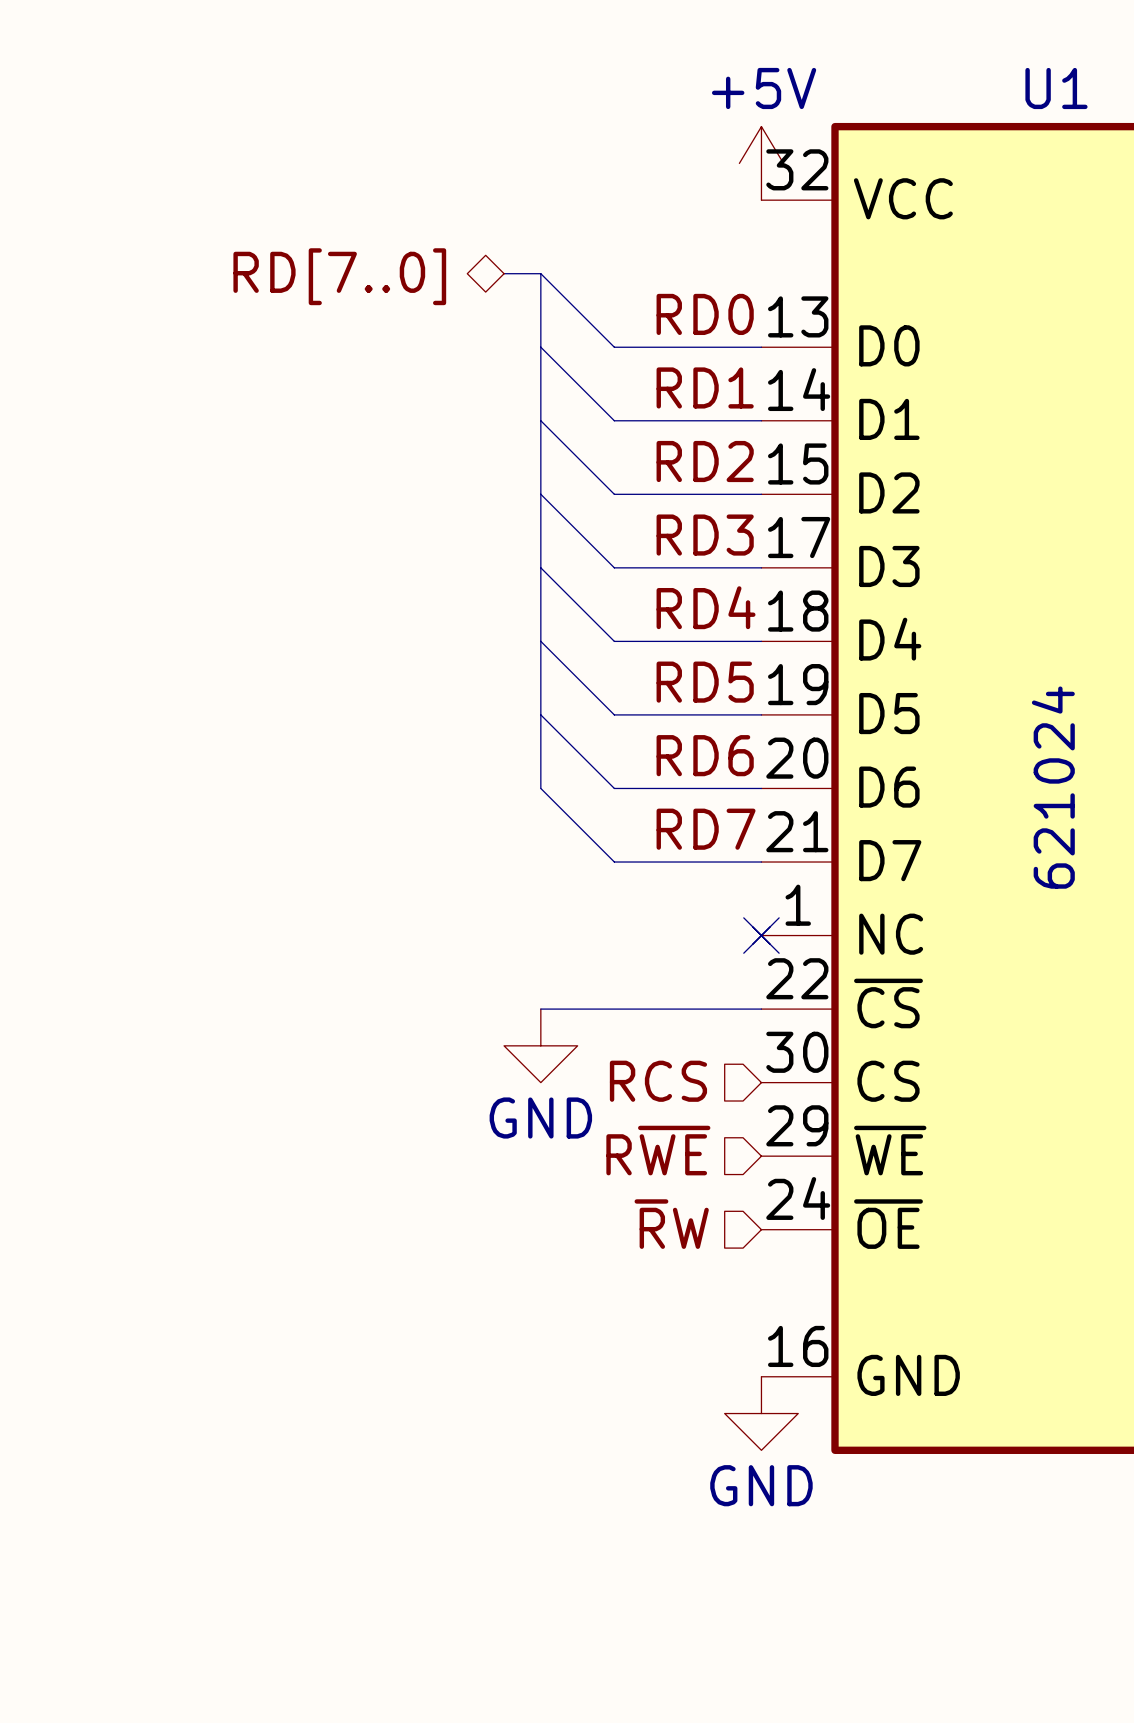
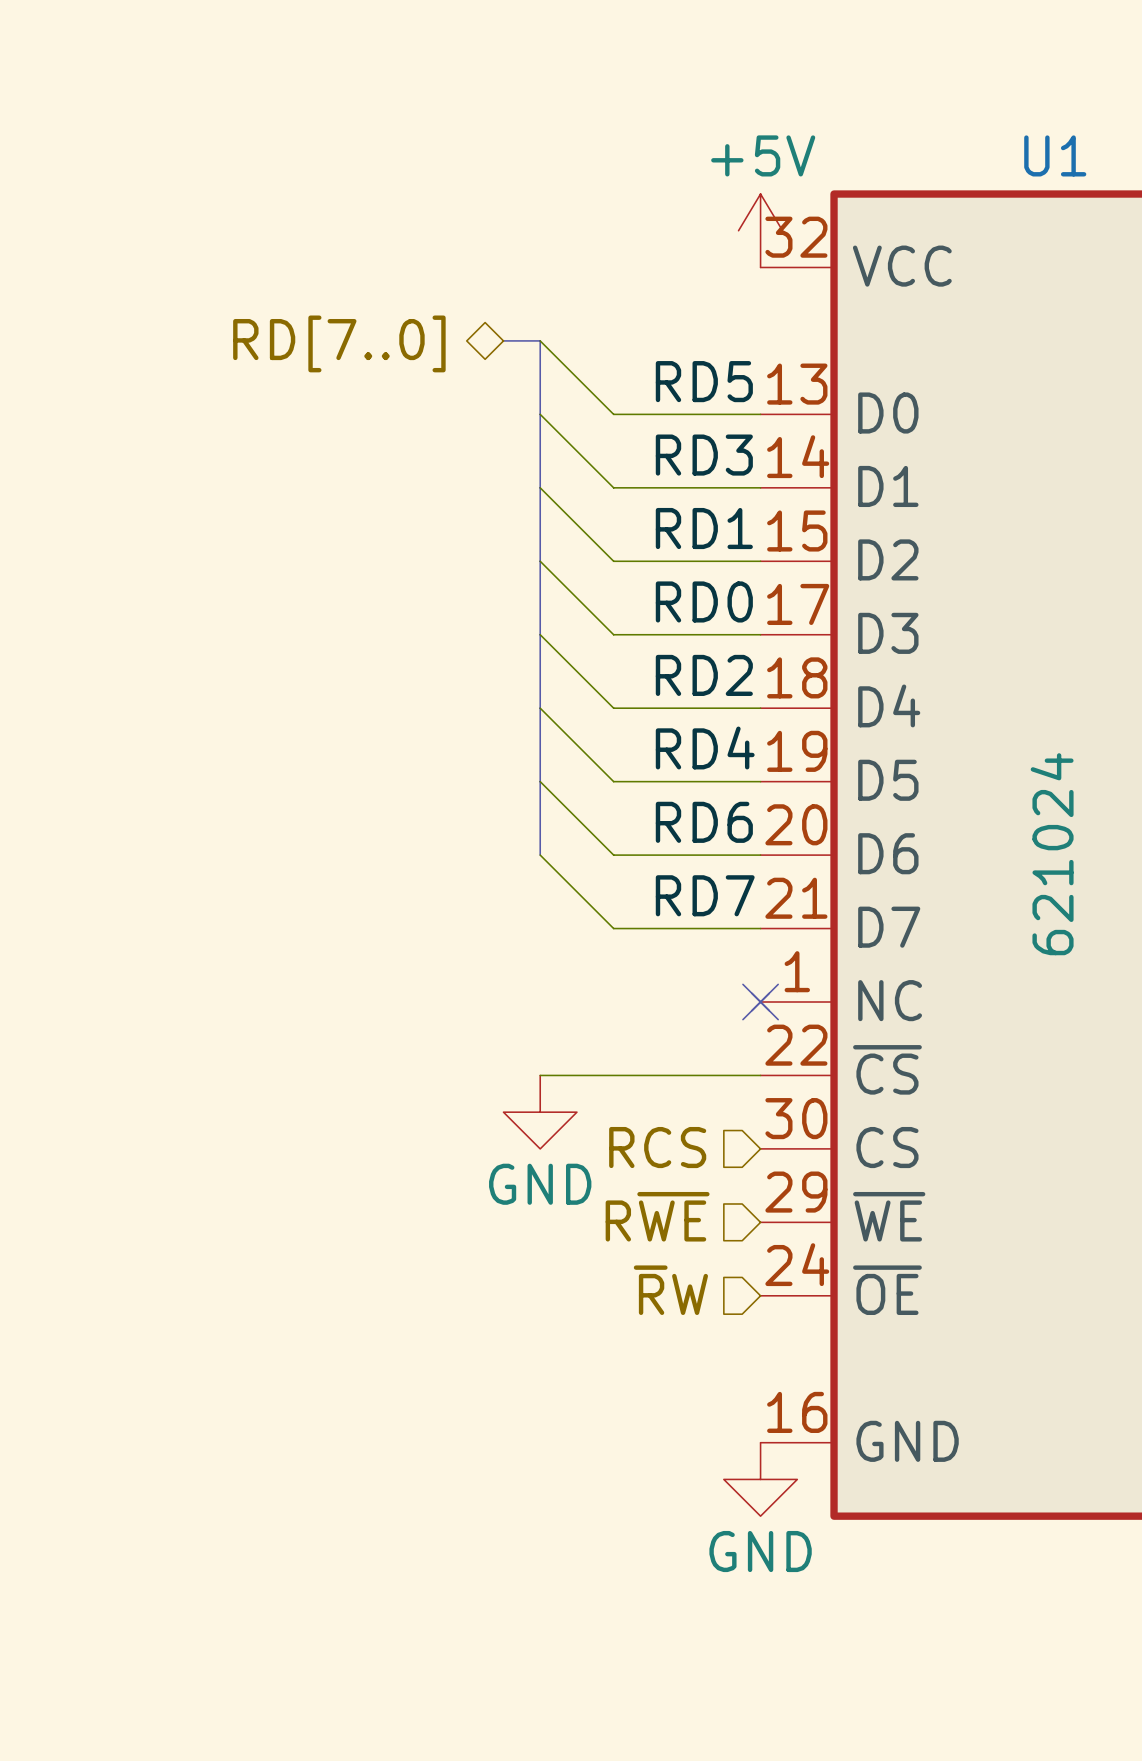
label: RD0 (705, 314) -> RD5 (704, 381)
label: RD1 (705, 387) -> RD3 (704, 455)
label: RD2 (705, 461) -> RD1 (704, 528)
label: RD3 (705, 535) -> RD0 (704, 601)
label: RD4 (706, 607) -> RD2 (704, 675)
label: RD5 (705, 682) -> RD4 (705, 747)

